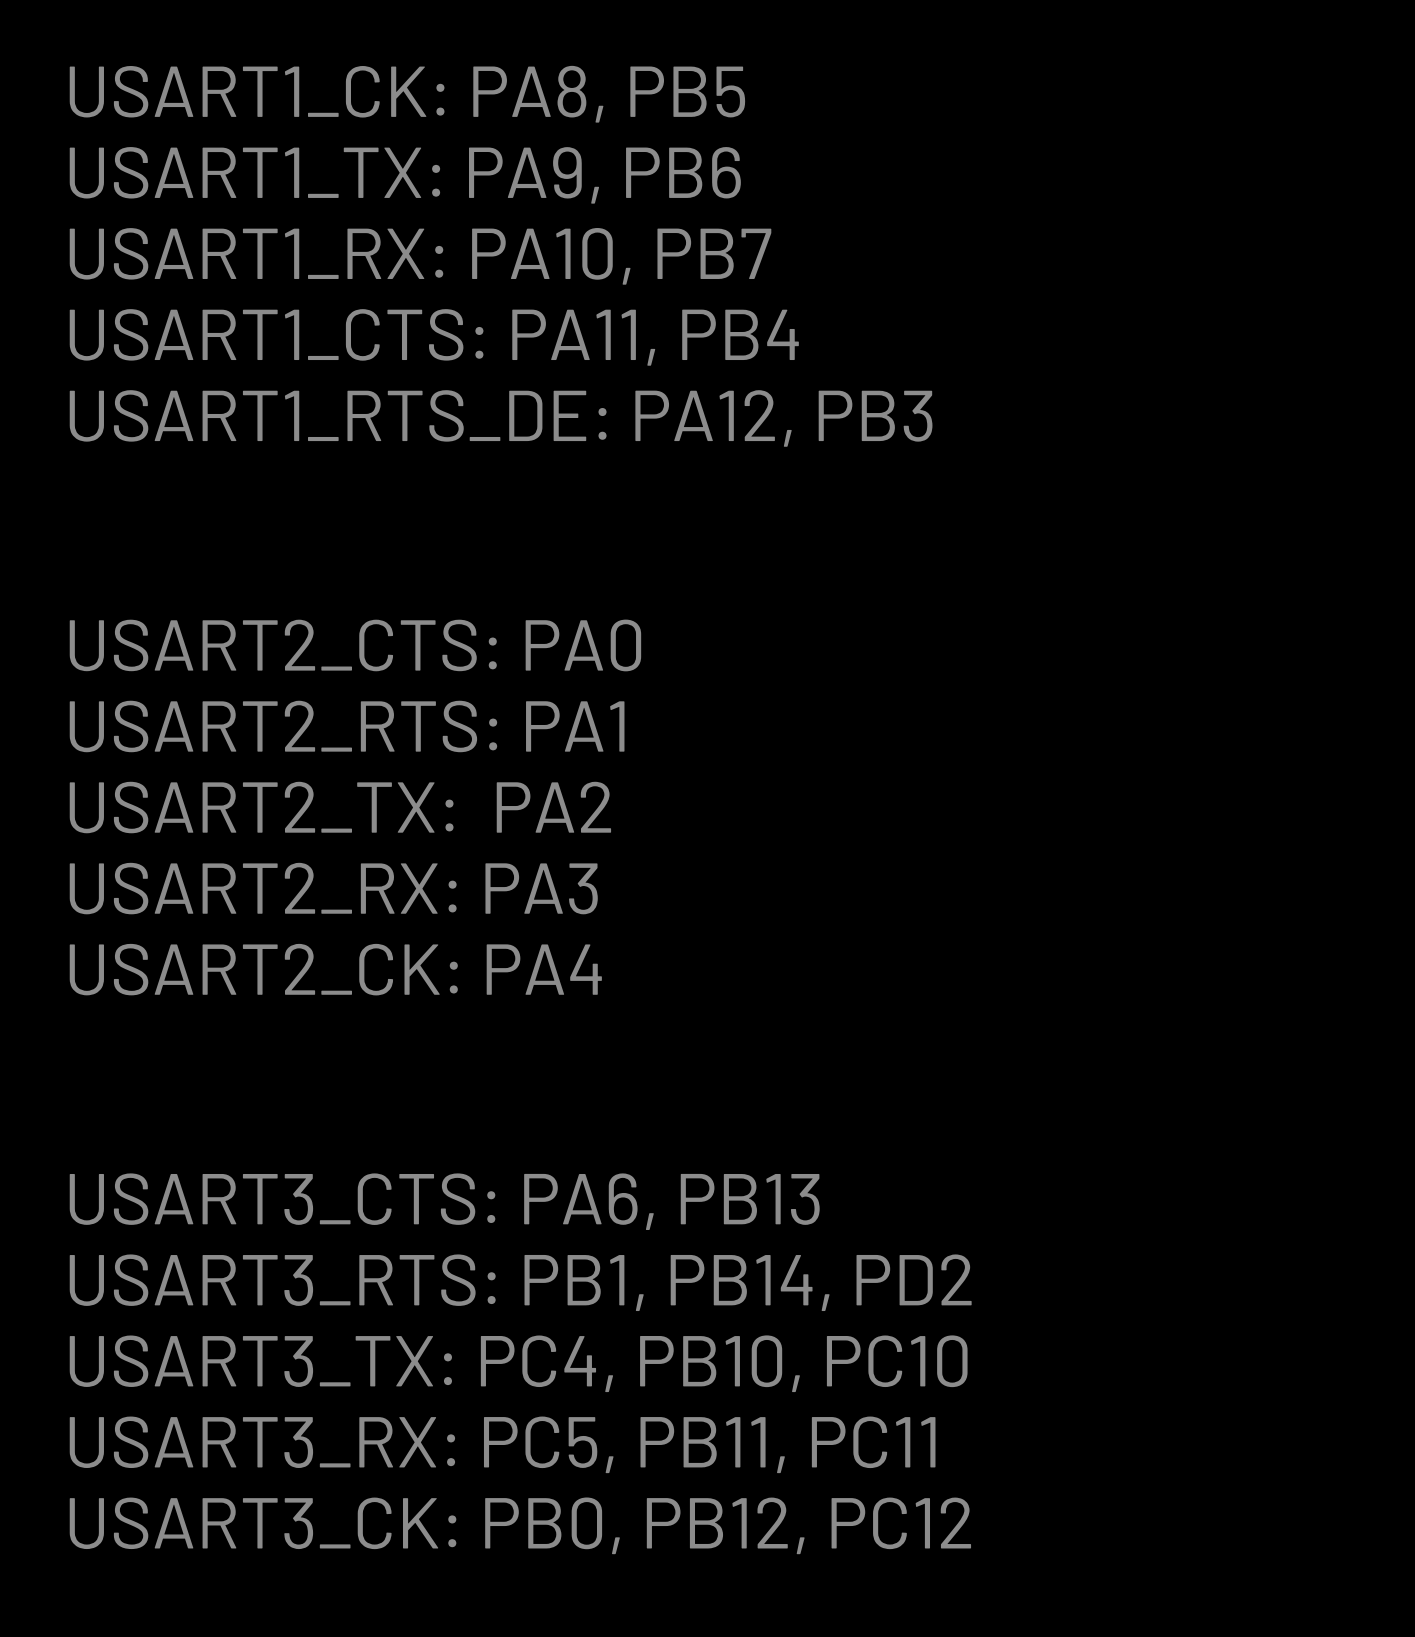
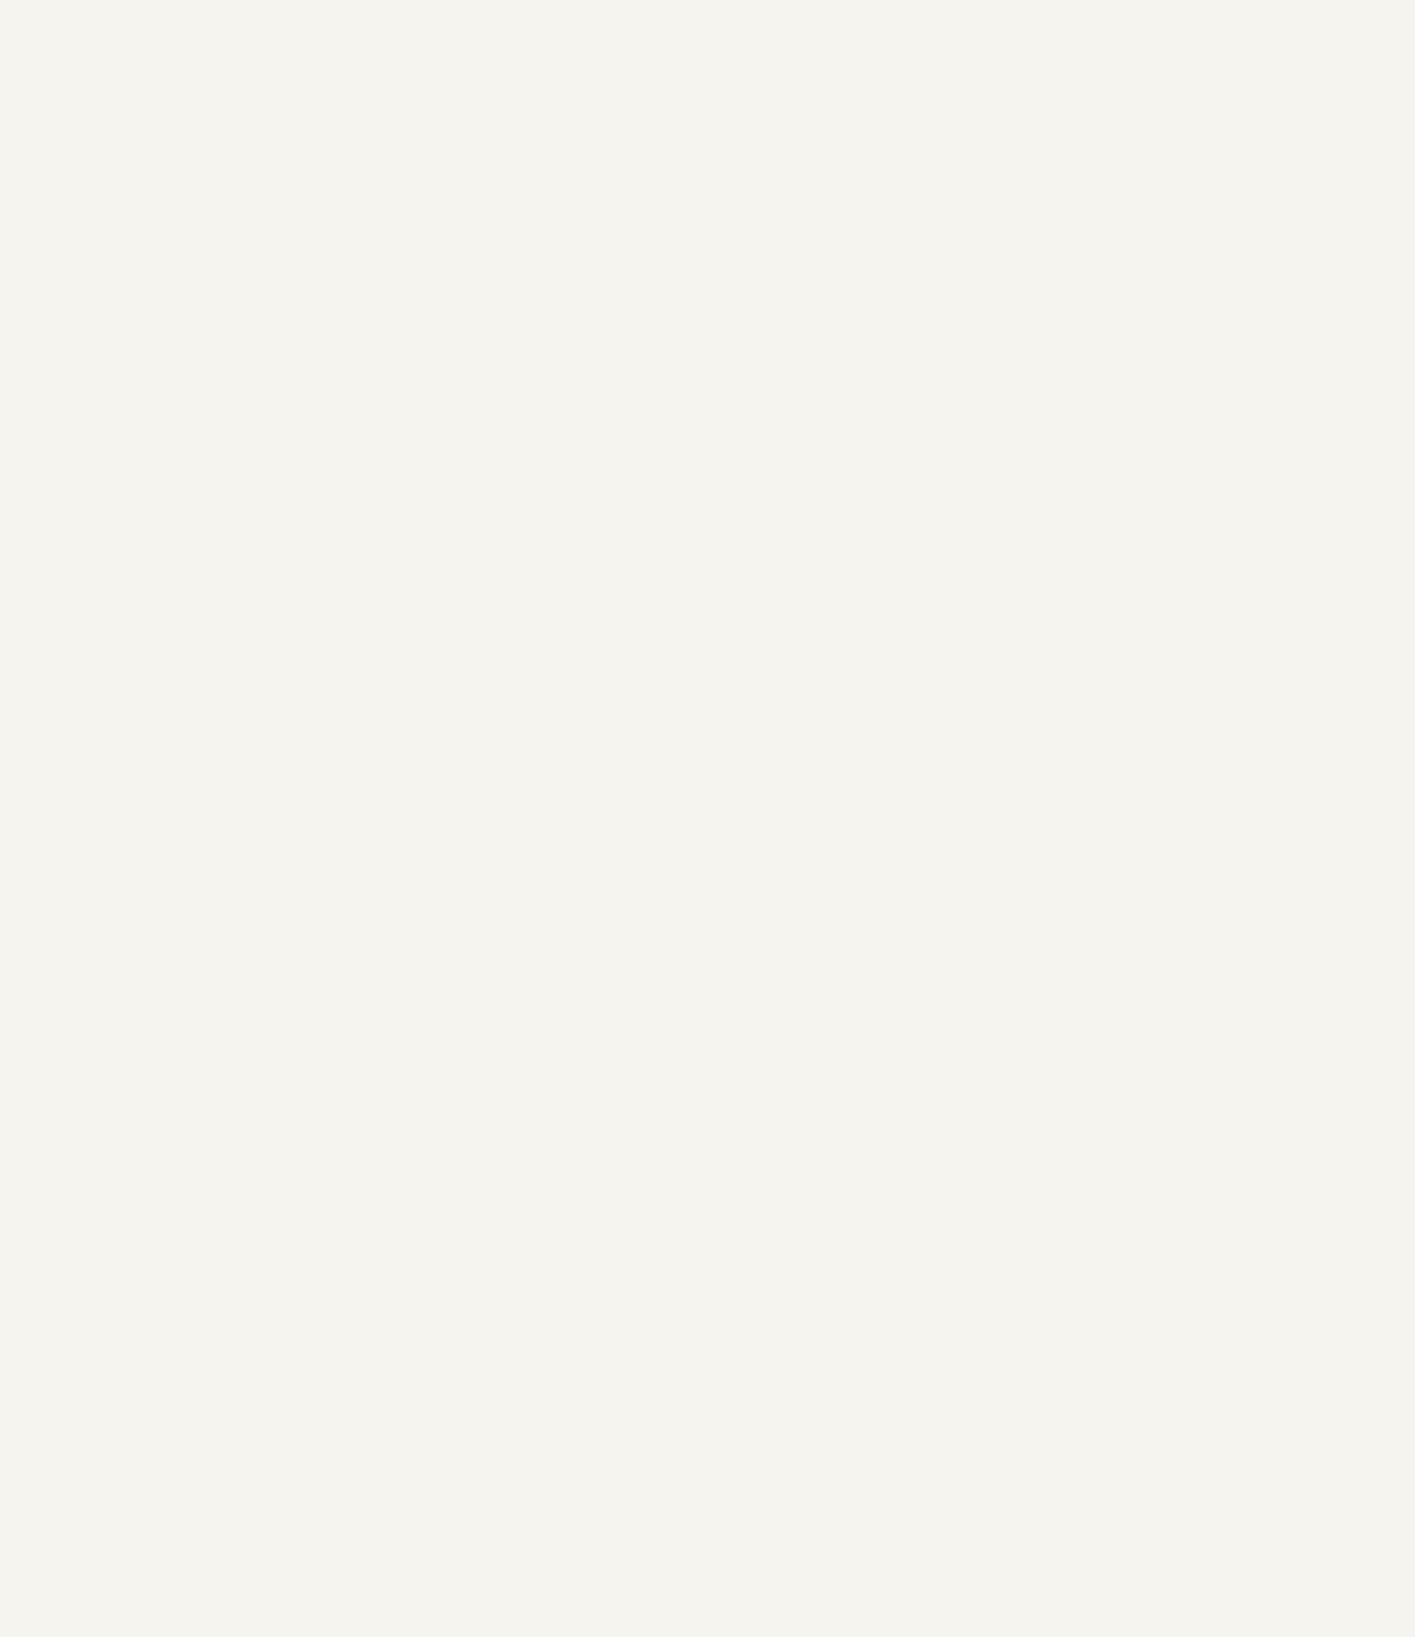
text: USART1_CK: PA8, PB5 (407, 94) -> none
text: USART1_TX: PA9, PB6 (405, 175) -> none
text: USART1_RX: PA10, PB7 (420, 256) -> none
text: USART1_CTS: PA11, PB4 (434, 337) -> none
text: USART1_RTS_DE: PA12, PB3 (501, 418) -> none
text: USART2_CTS: PA0 (355, 645) -> none
text: USART2_RTS: PA1 (347, 726) -> none
text: USART2_TX: PA2 (340, 807) -> none
text: USART2_RX: PA3 (333, 888) -> none
text: USART2_CK: PA4 (335, 969) -> none
text: USART3_CTS: PA6, PB13 (444, 1201) -> none
text: USART3_RTS: PB1, PB14, PD2 (520, 1282) -> none
text: USART3_TX: PC4, PB10, PC10 (518, 1363) -> none
text: USART3_RX: PC5, PB11, PC11 (502, 1444) -> none
text: USART3_CK: PB0, PB12, PC12 (520, 1525) -> none

